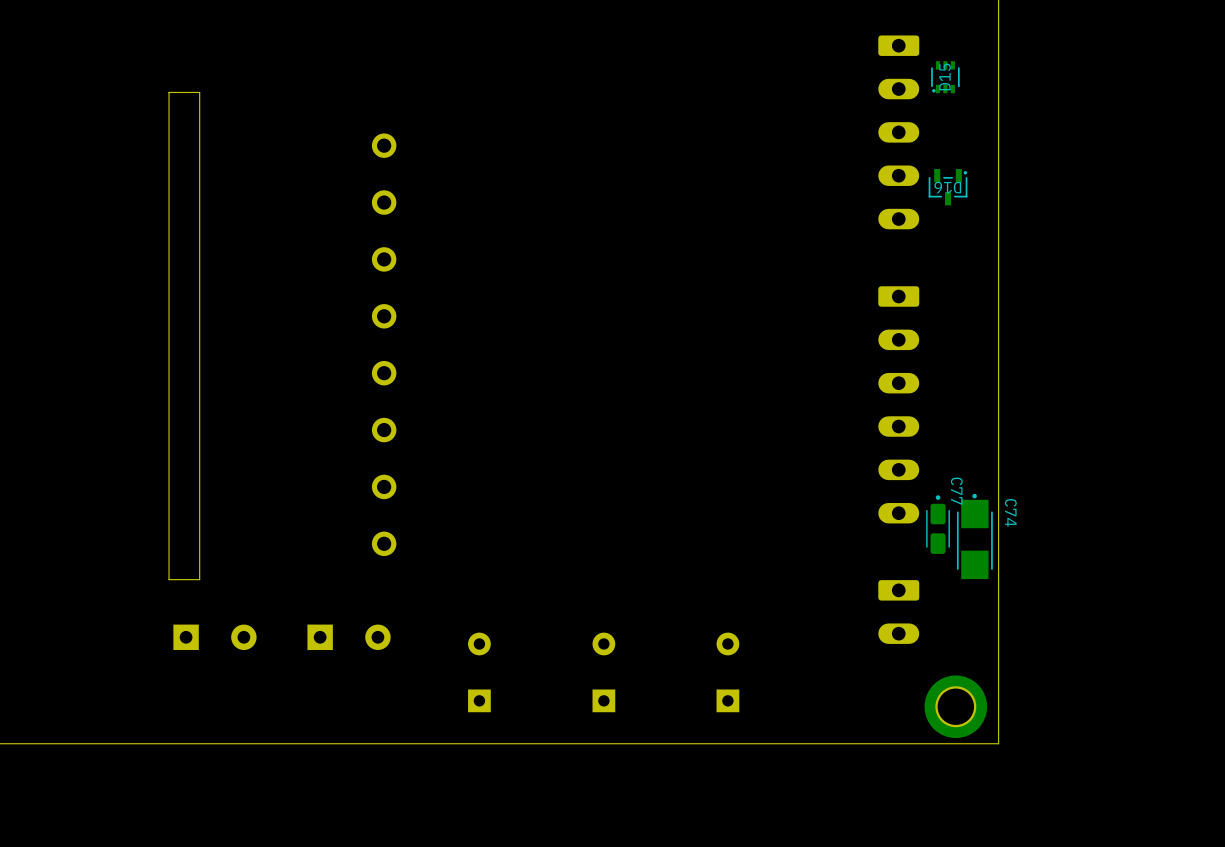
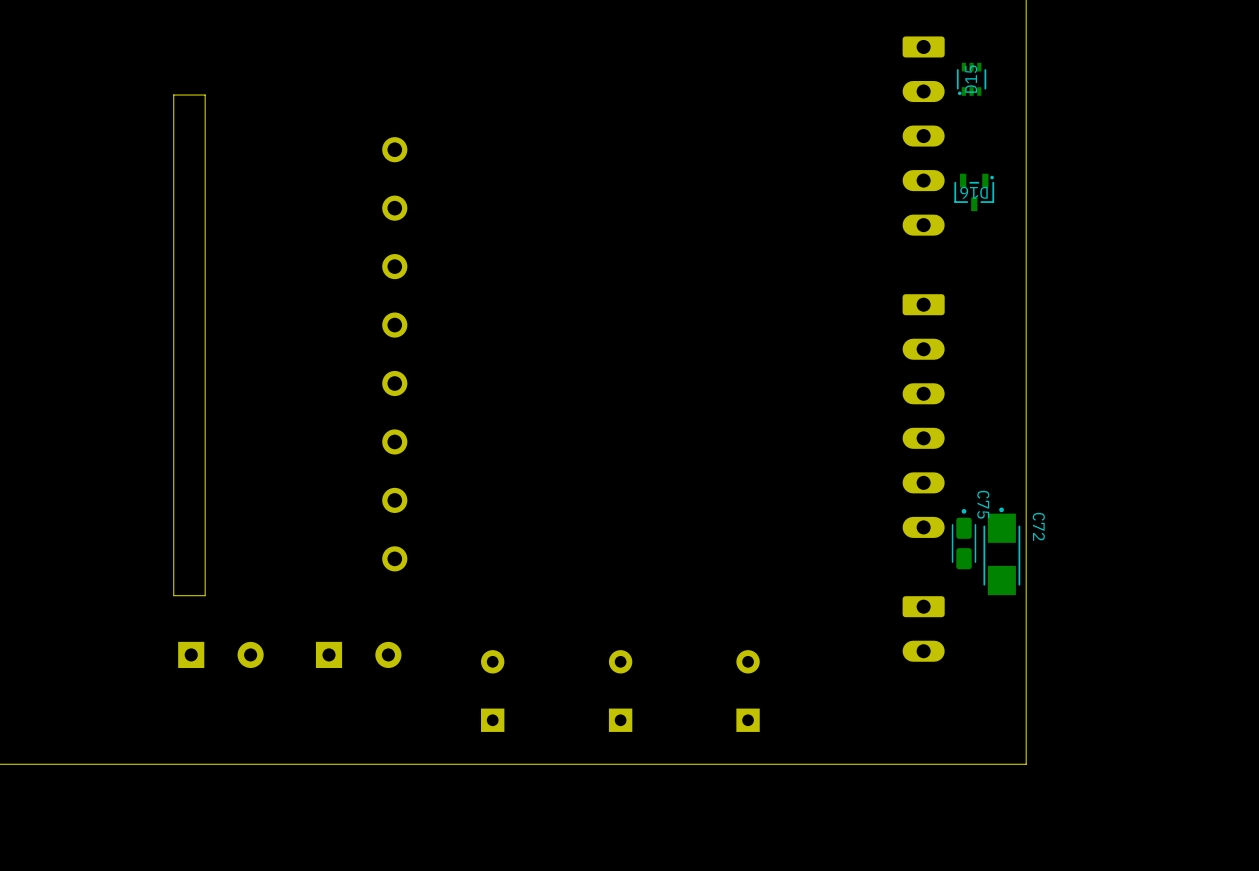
C77 name: C77 (956, 491) -> C75 (983, 504)
C74 name: C74 (1010, 512) -> C72 (1038, 526)
part: (955, 706) -> none

